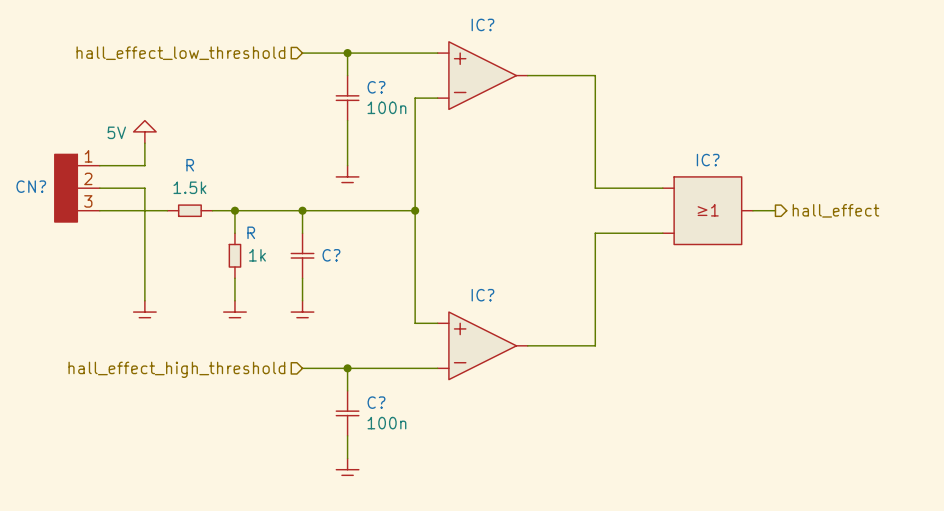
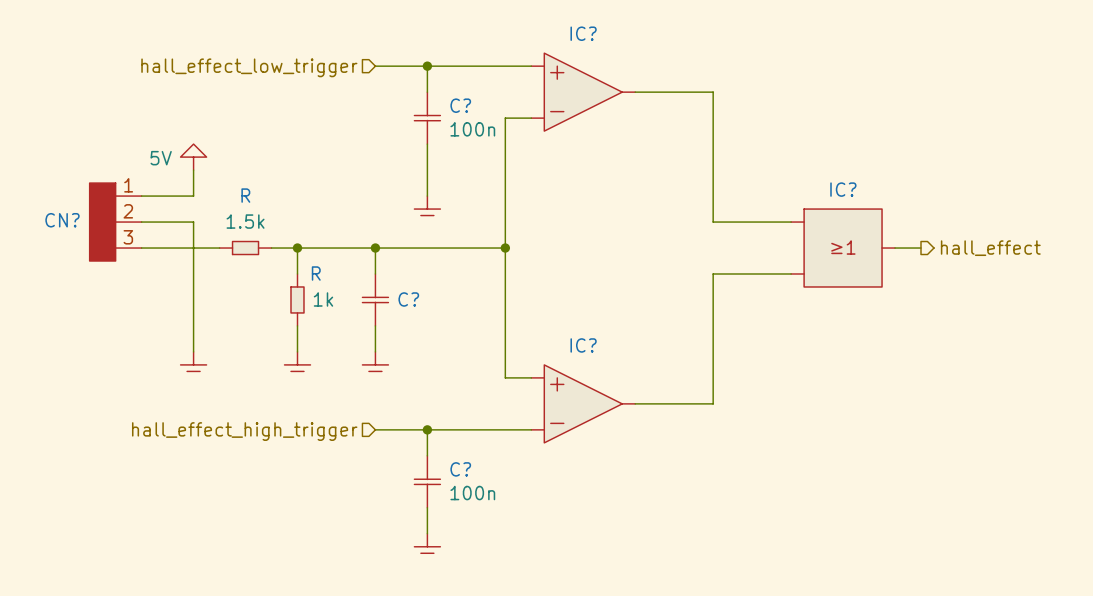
hierarchical label: hall_effect_low_threshold (180, 53) -> hall_effect_low_trigger (249, 67)
hierarchical label: hall_effect_high_threshold (176, 369) -> hall_effect_high_trigger (244, 431)

